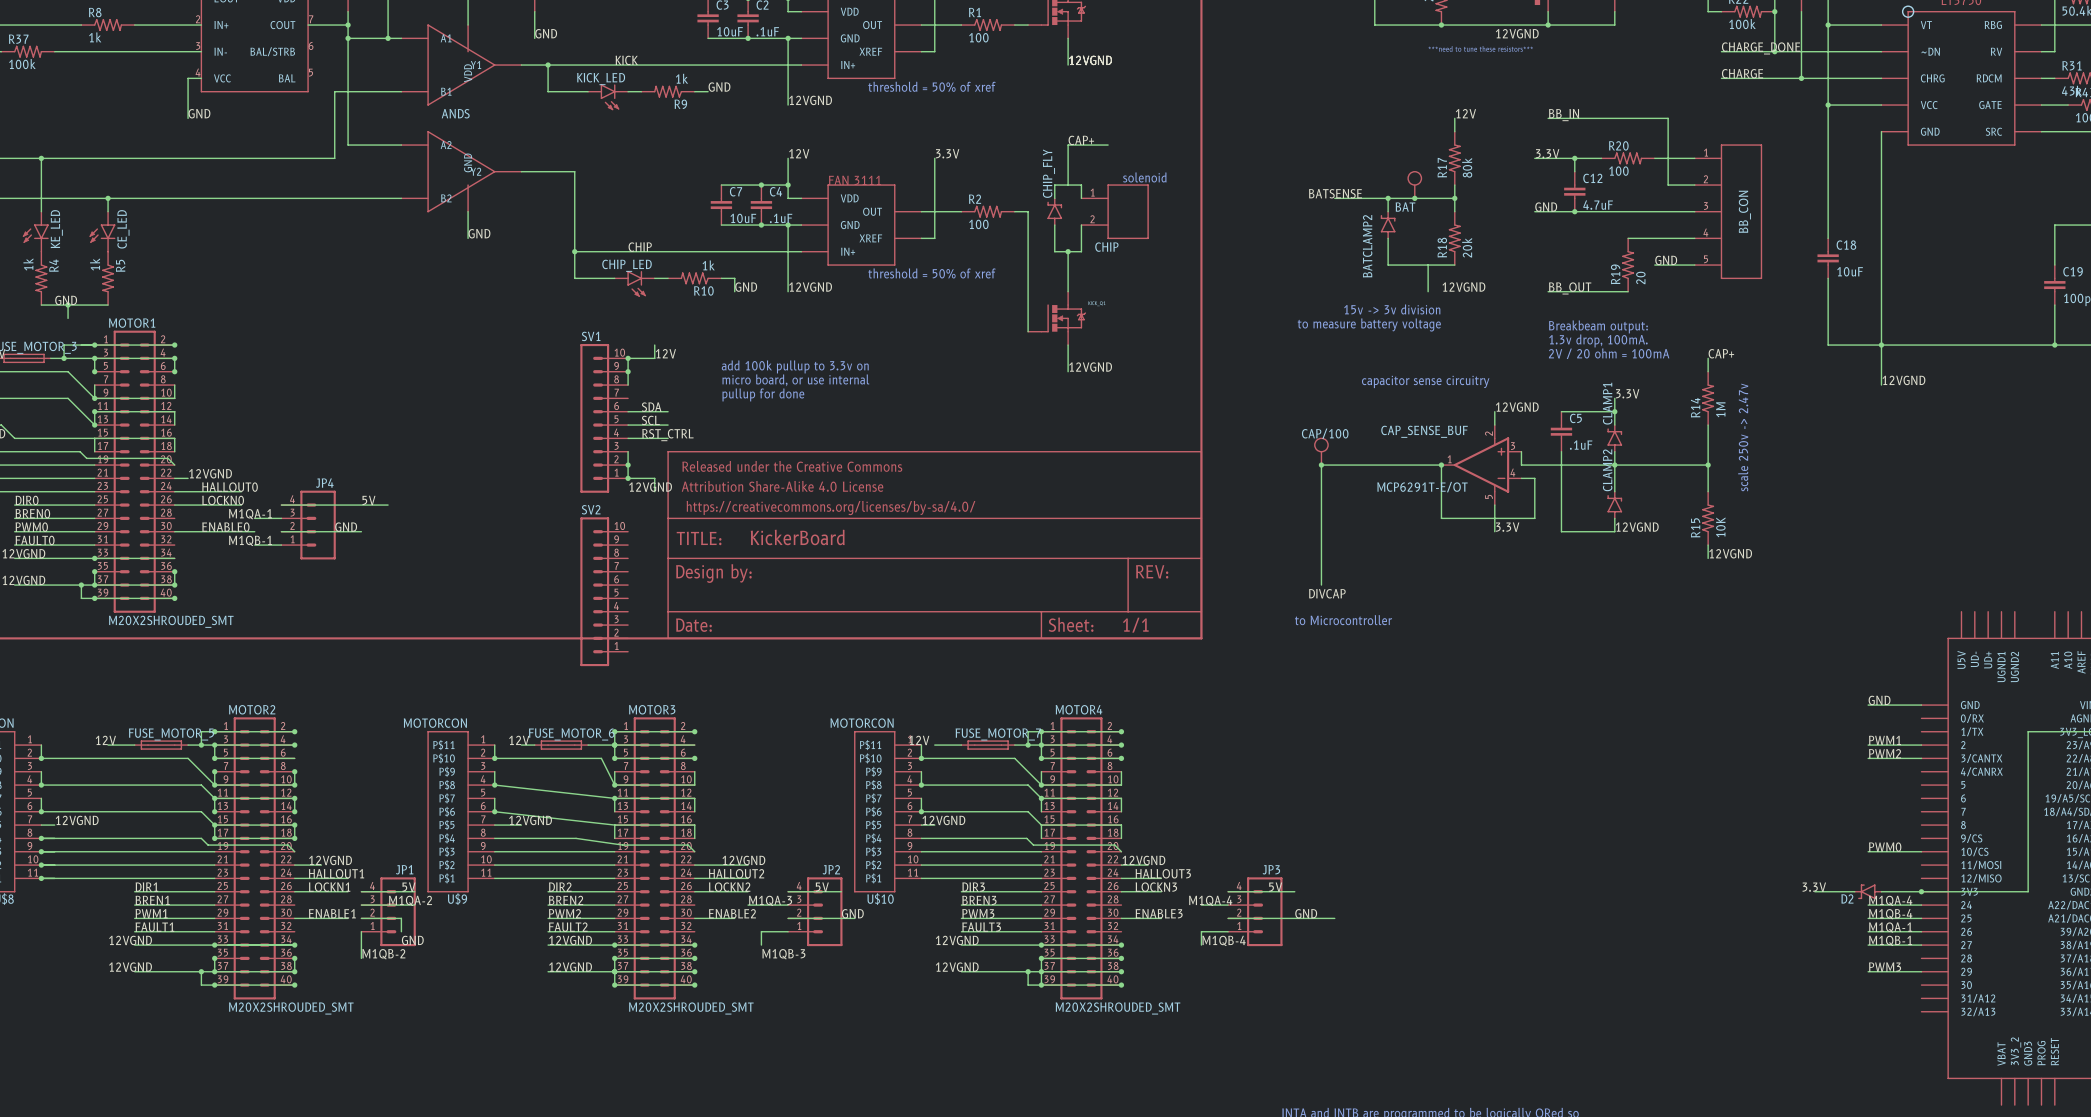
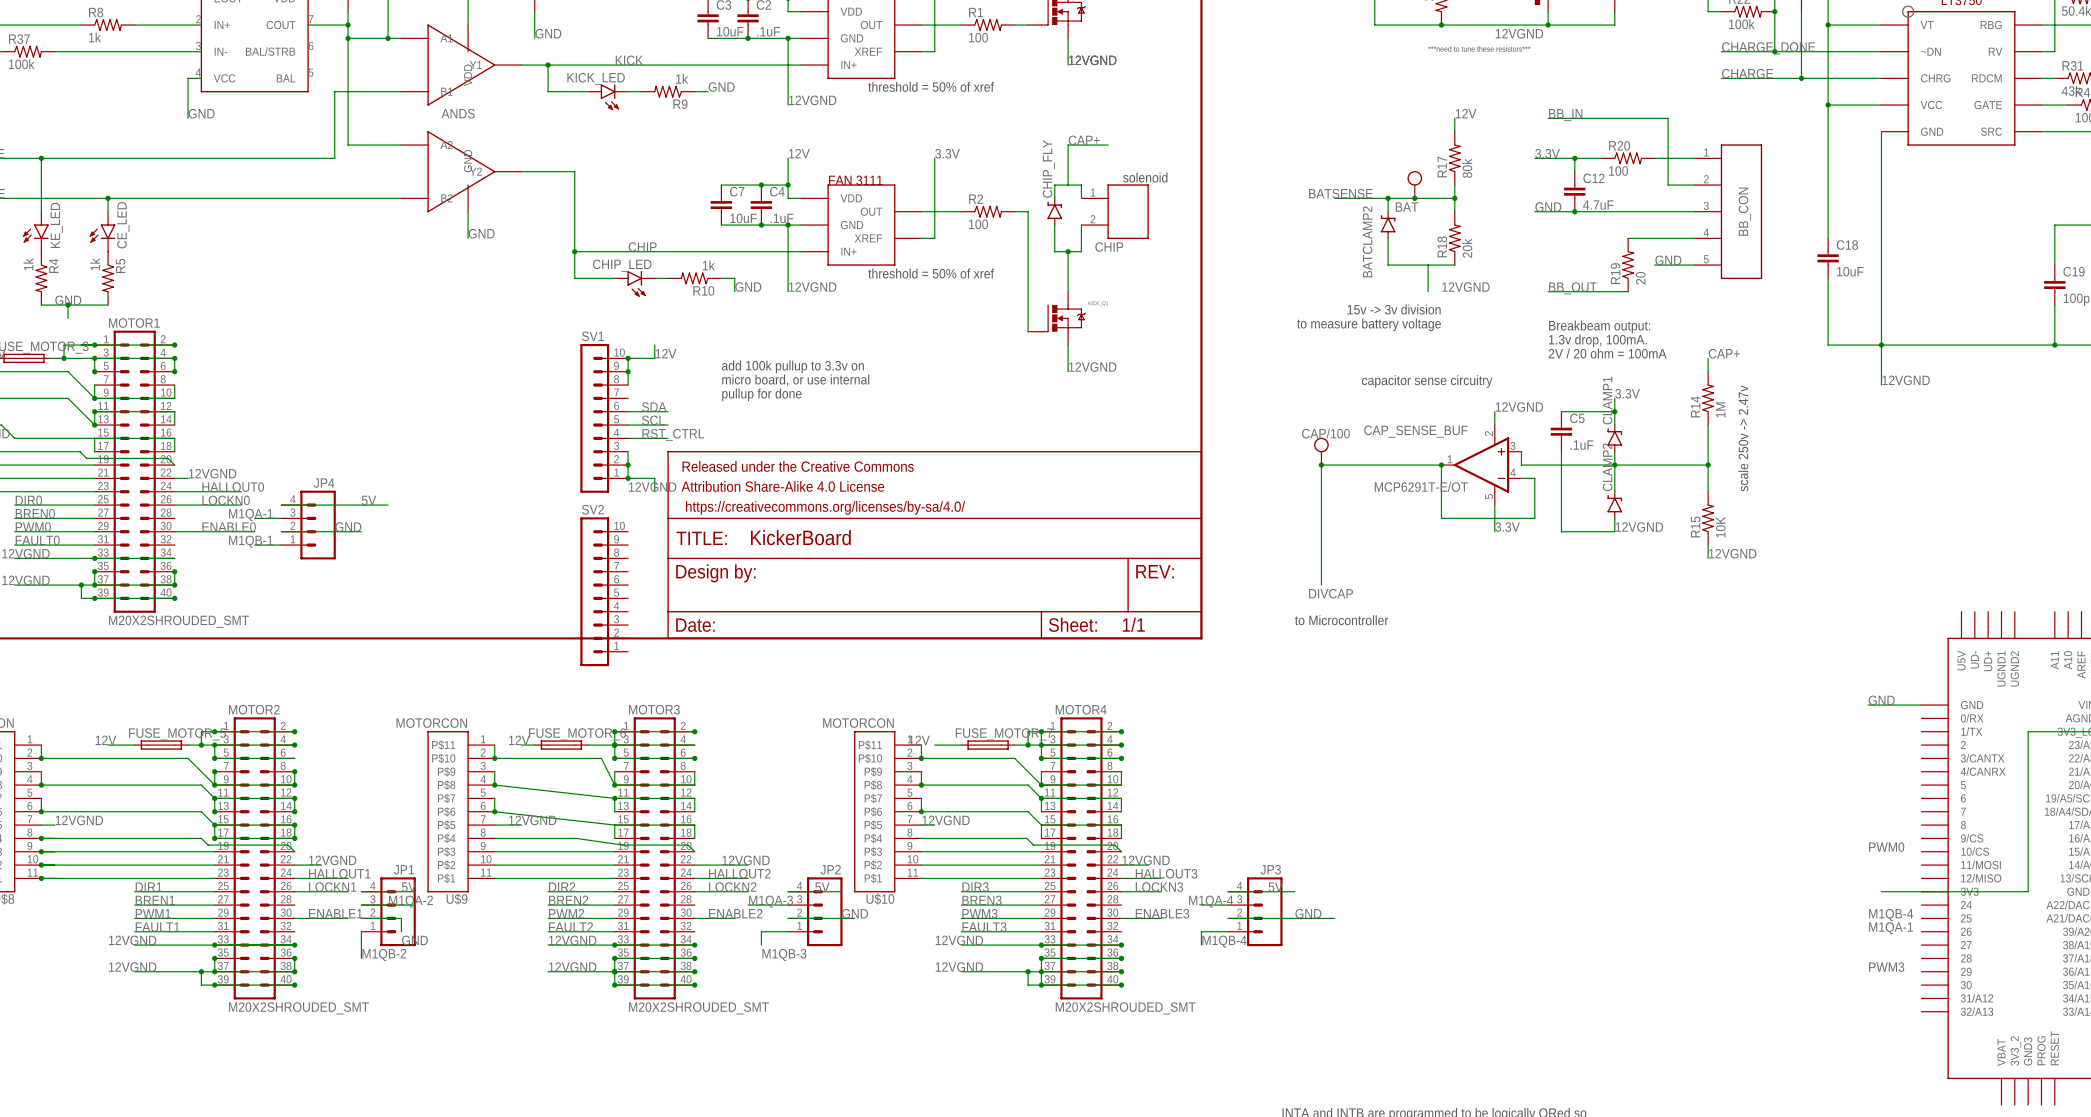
label: PWM1 (1885, 740) -> none
wire: (1868, 745) (1921, 745) -> none
label: PWM2 (1885, 753) -> none
wire: (1868, 758) (1921, 758) -> none
wire: (1868, 851) (1921, 851) -> none
label: 3.3V (1814, 887) -> none
wire: (1814, 891) (1854, 891) -> none
D2: (1868, 891) -> none
junction: (1921, 891) -> none
label: M1QA-4 (1890, 900) -> none
wire: (1868, 905) (1921, 905) -> none
wire: (1868, 918) (1921, 918) -> none
wire: (1868, 931) (1921, 931) -> none
label: M1QB-1 (1890, 940) -> none
wire: (1868, 945) (1921, 945) -> none
wire: (1868, 971) (1921, 971) -> none

